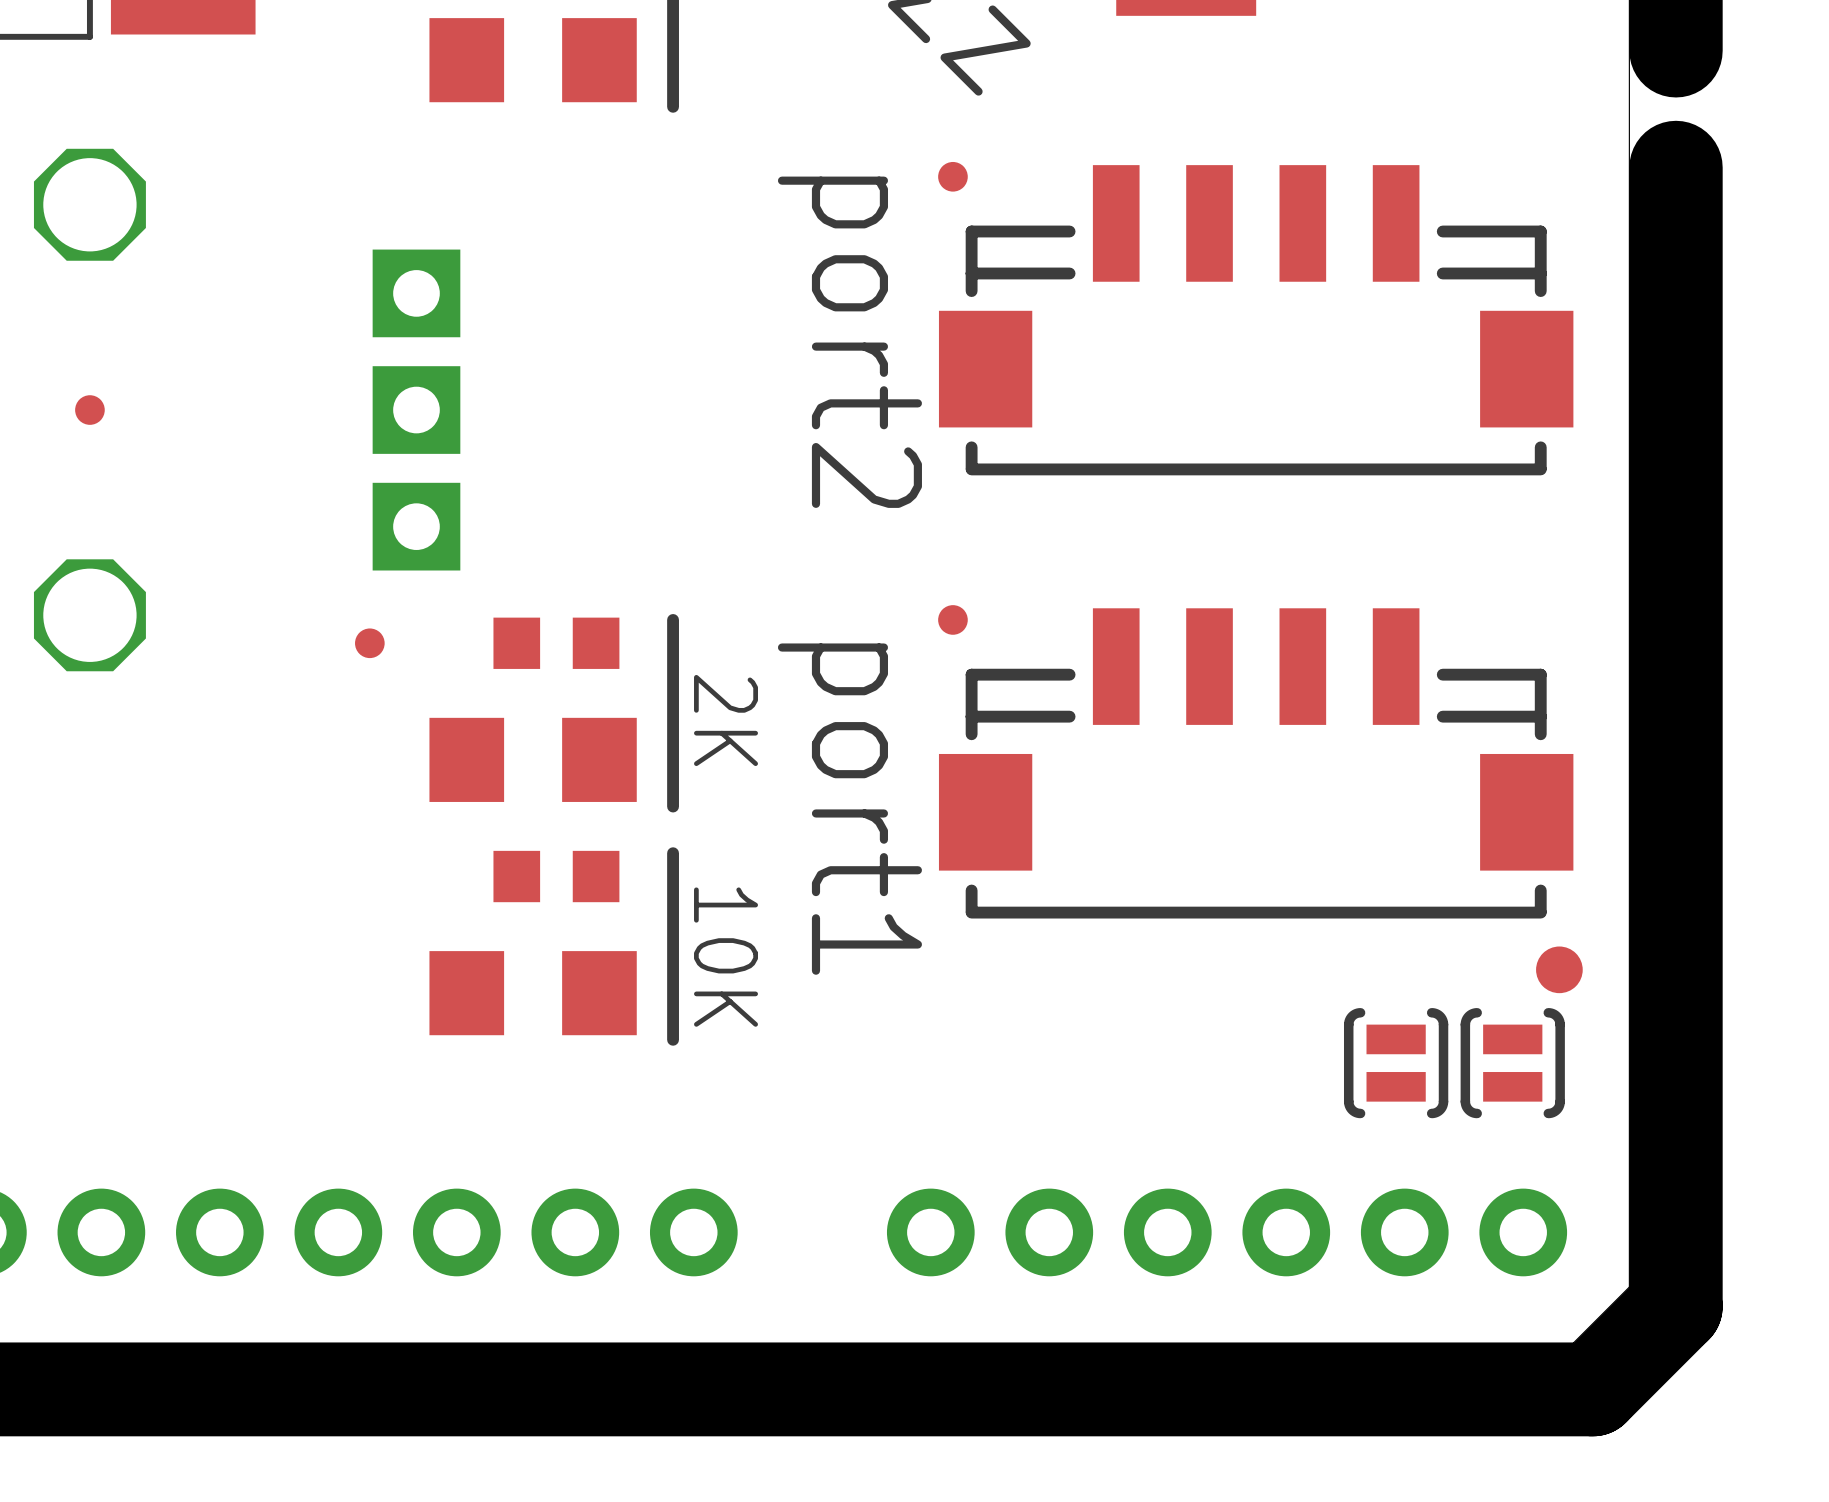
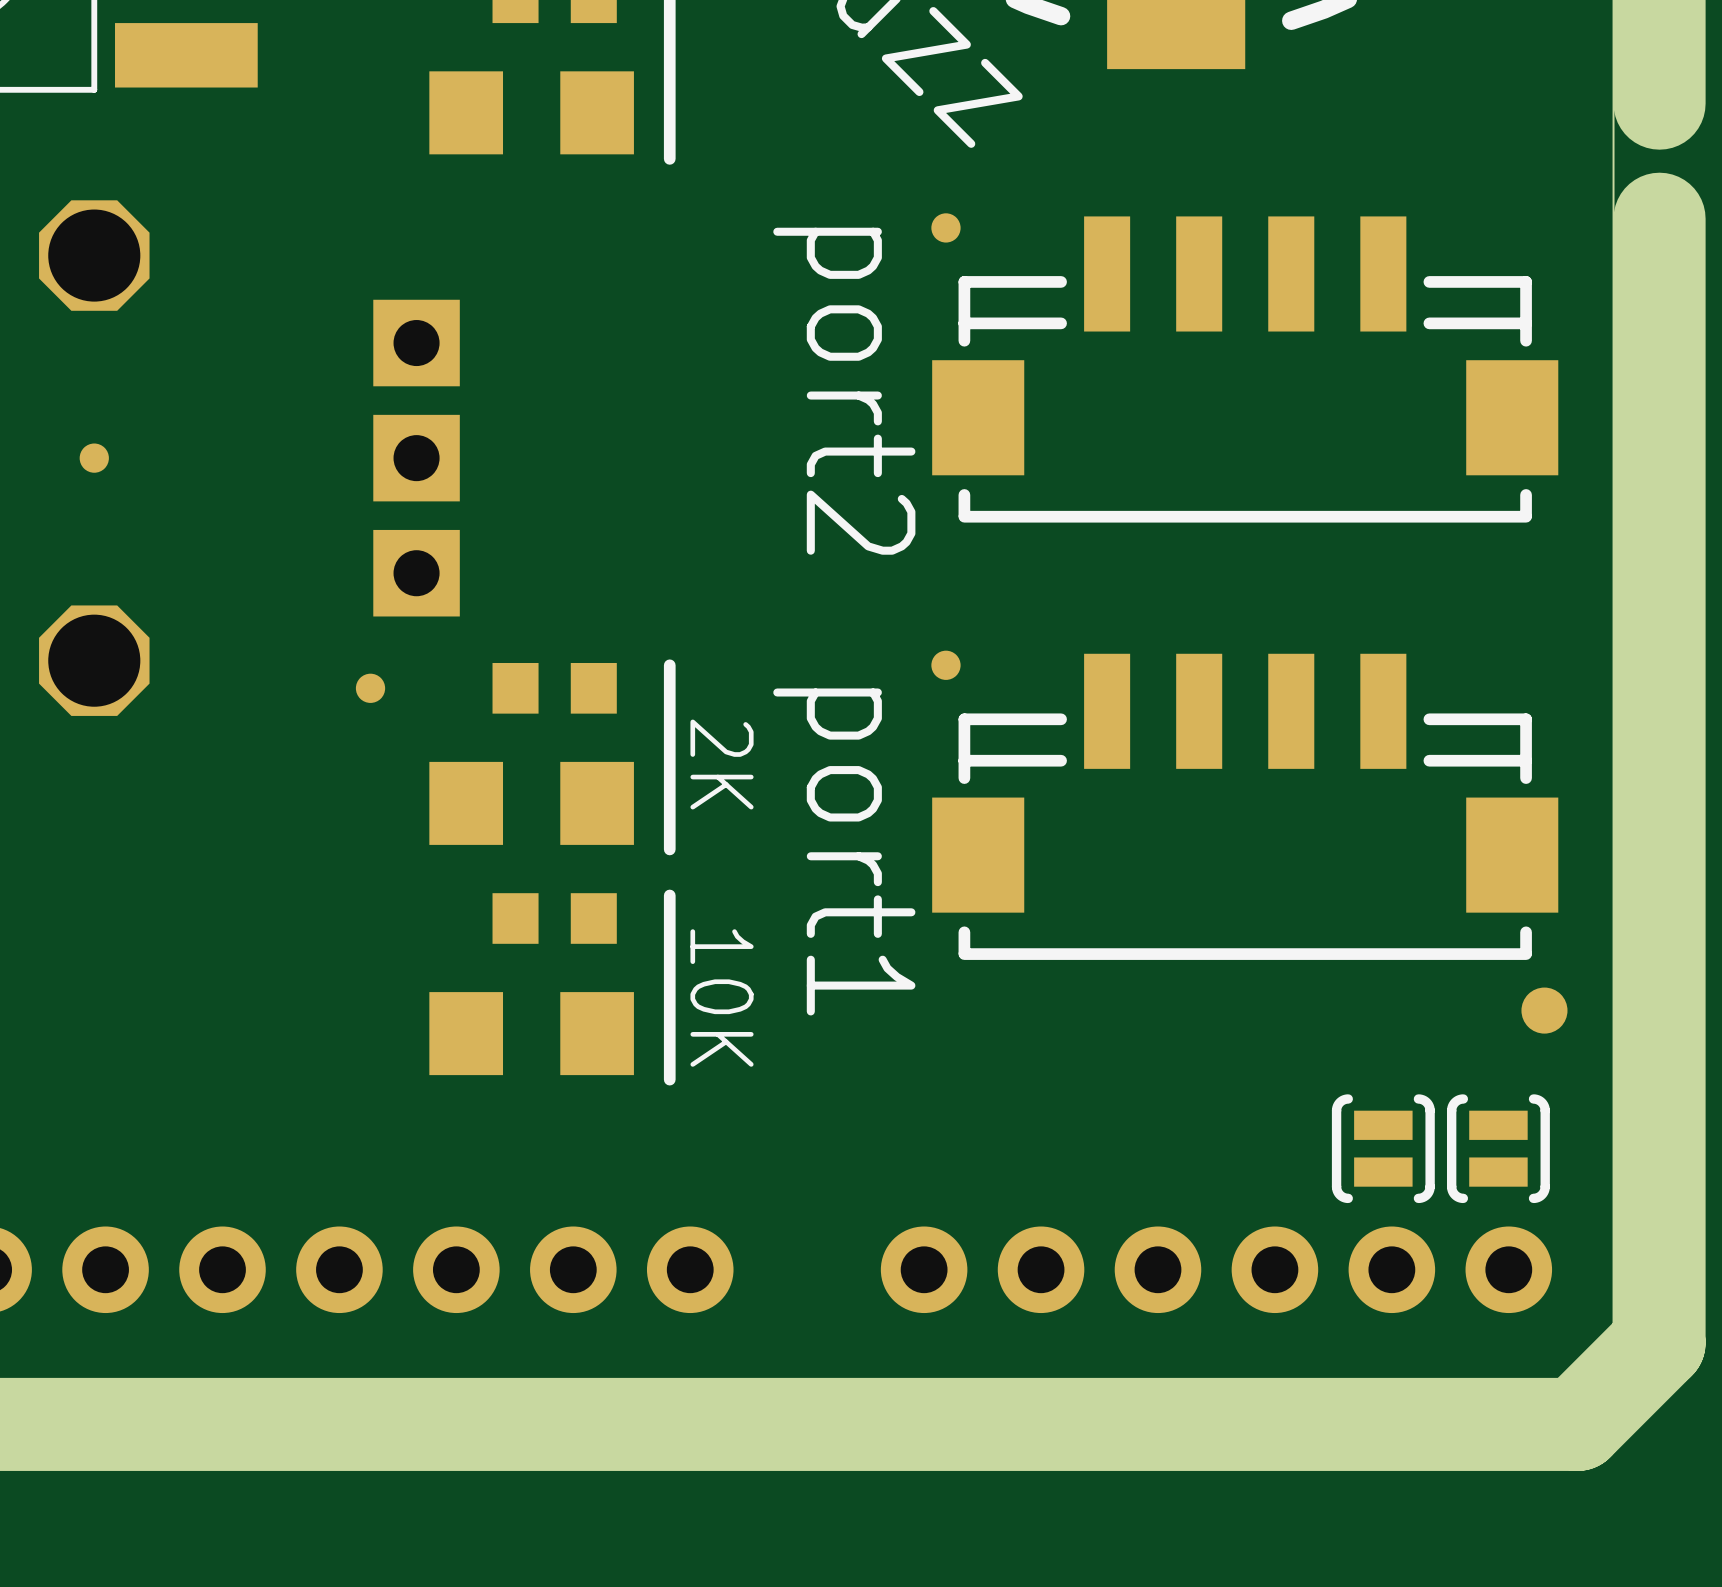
part position: (1396, 1063) -> (1383, 1148)
part position: (1512, 1063) -> (1498, 1148)

